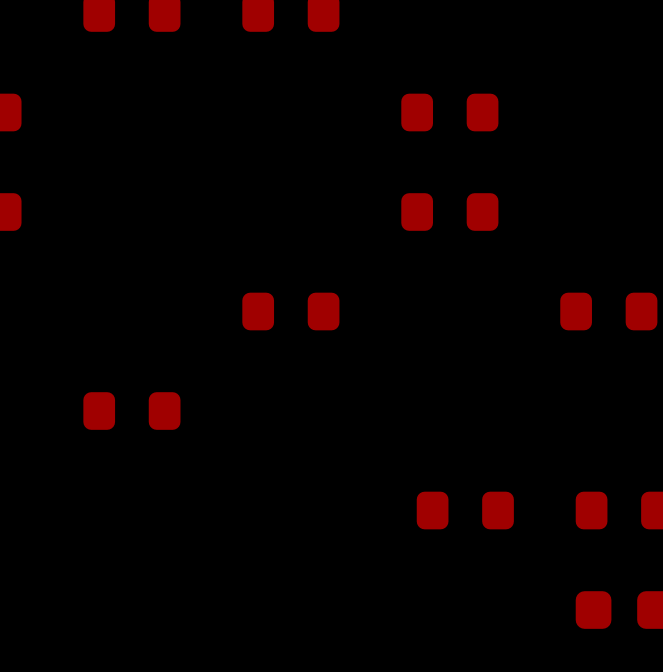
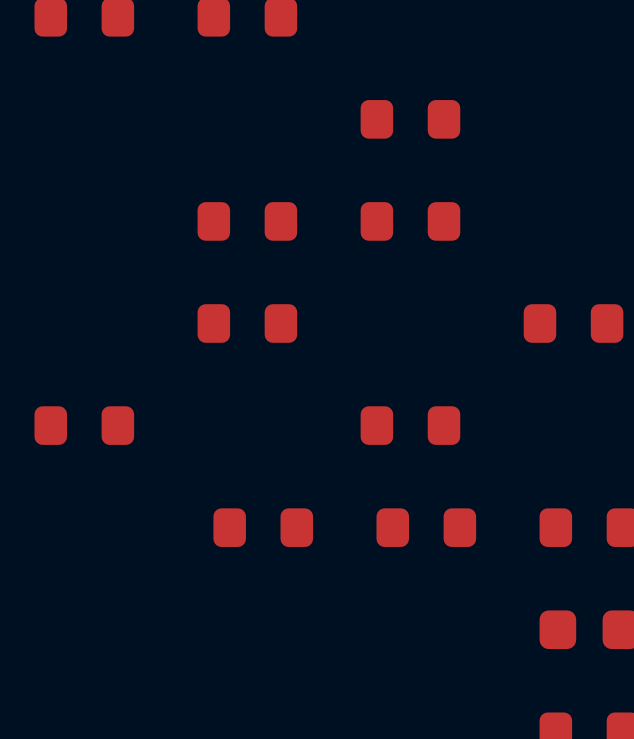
part: none -> (247, 221)
part: none -> (410, 425)
part: none -> (263, 527)

